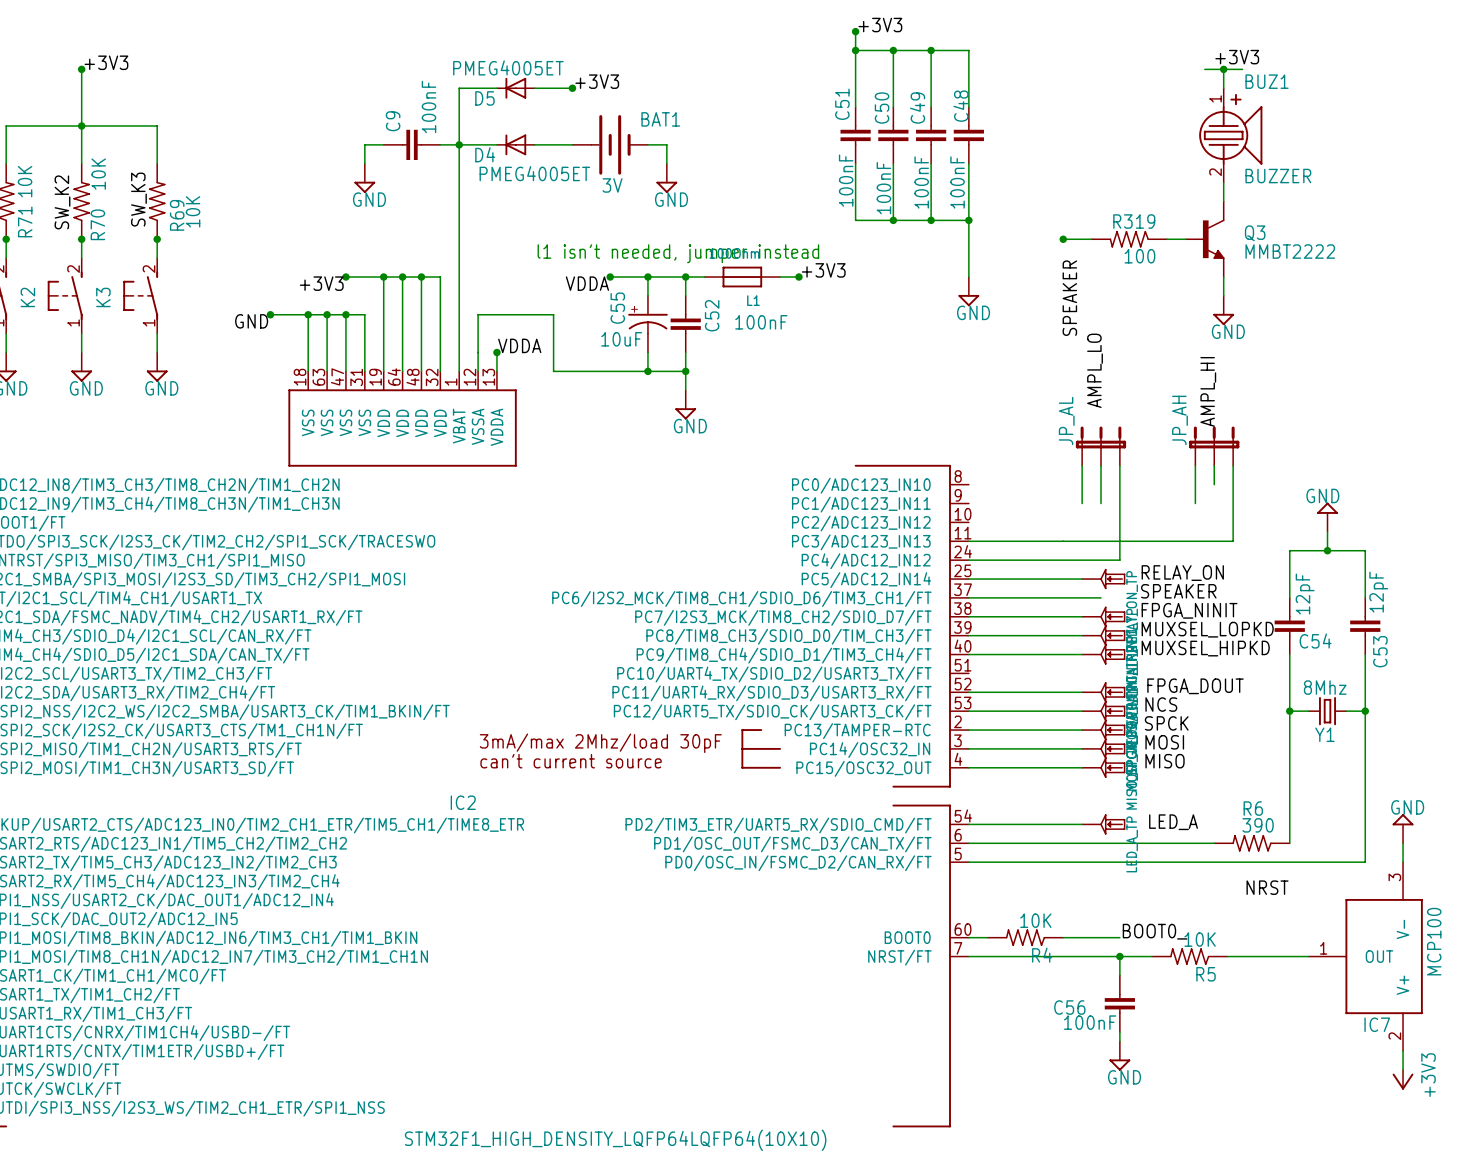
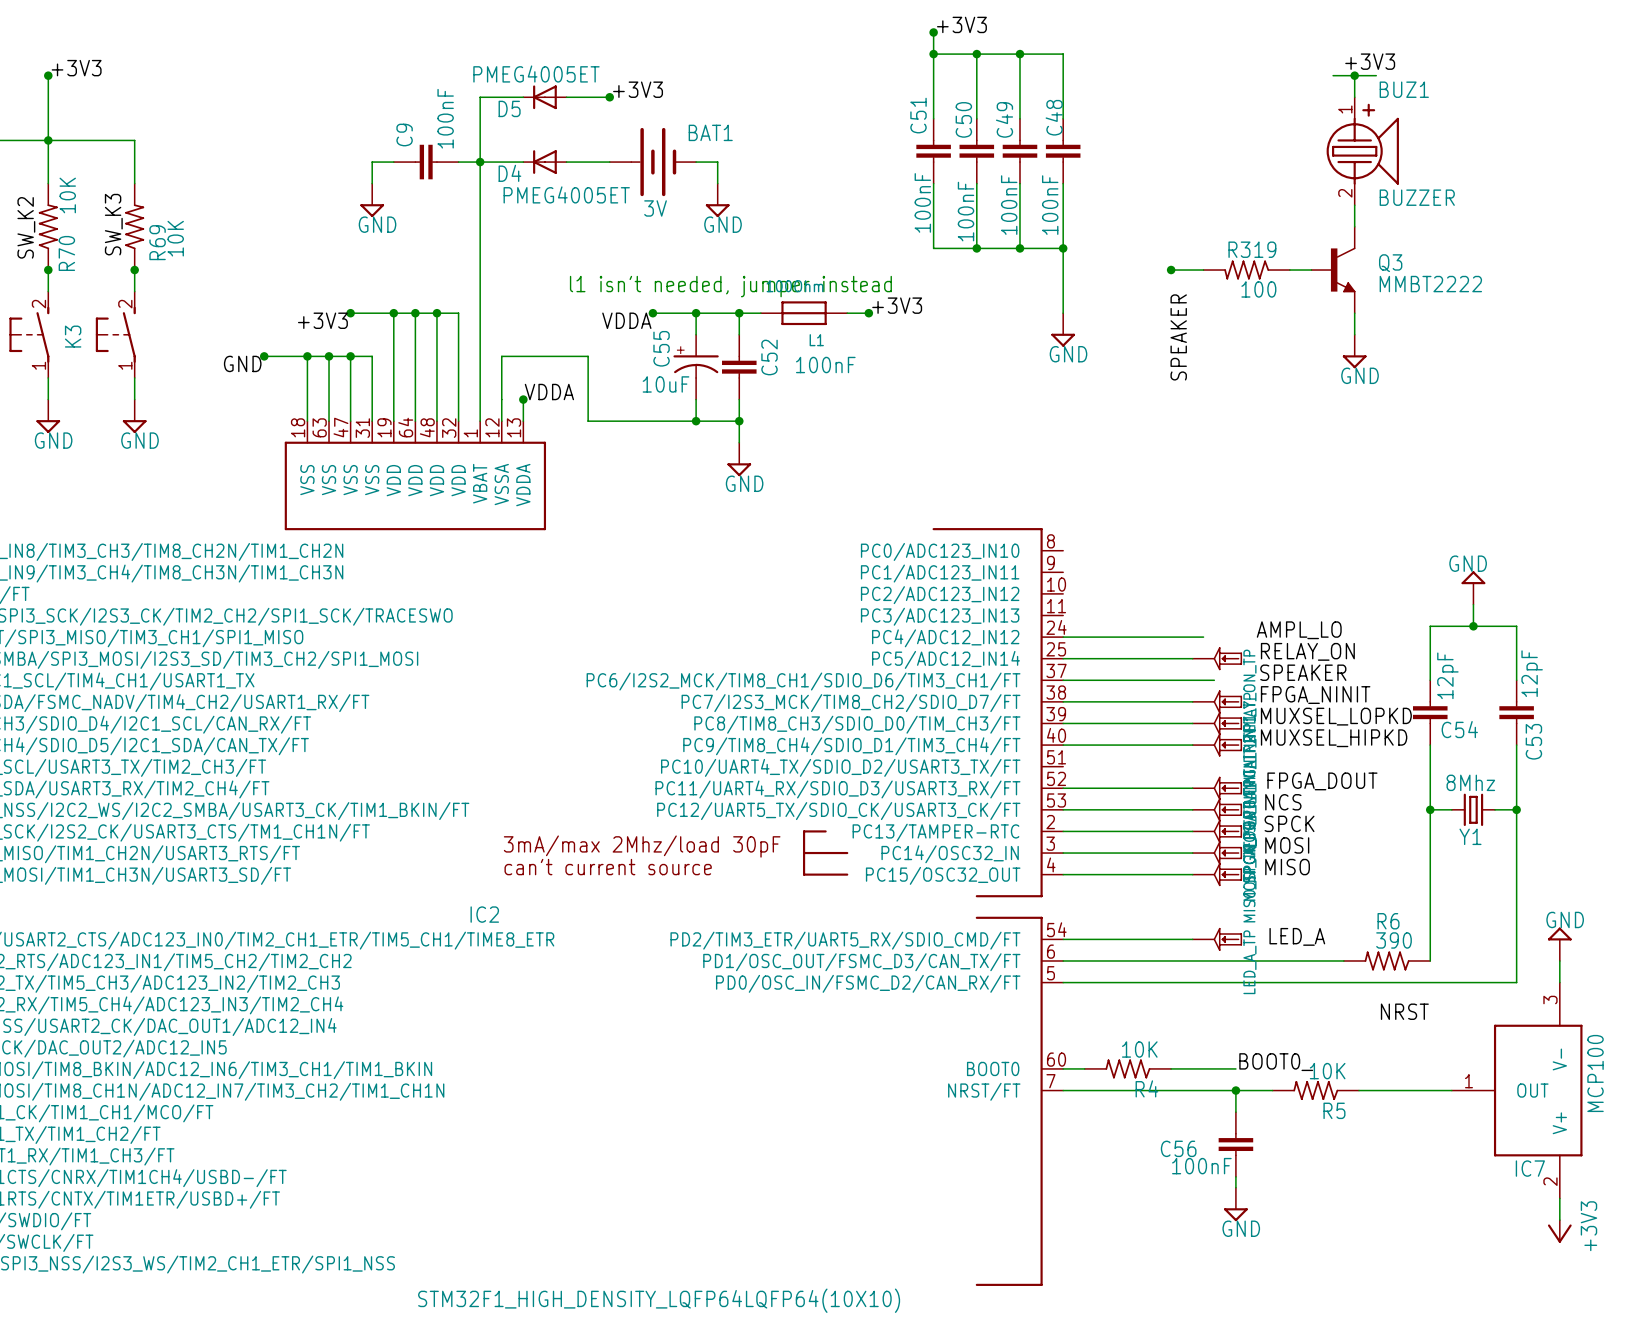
label rotation: 0° (1095, 370) -> 90° clockwise (1299, 630)
label position: AMPL_LO (1095, 370) -> AMPL_LO (1299, 630)
label: AMPL_HI (1208, 391) -> none
JP_AL: (1101, 446) -> none
JP_AH: (1214, 446) -> none
wire: (1082, 465) (1082, 503) -> none
wire: (1101, 465) (1101, 503) -> none
wire: (1119, 465) (1119, 560) (1091, 560) -> none
wire: (1195, 465) (1195, 503) -> none
wire: (1214, 465) (1214, 484) -> none
wire: (1233, 465) (1233, 541) (968, 541) -> none

